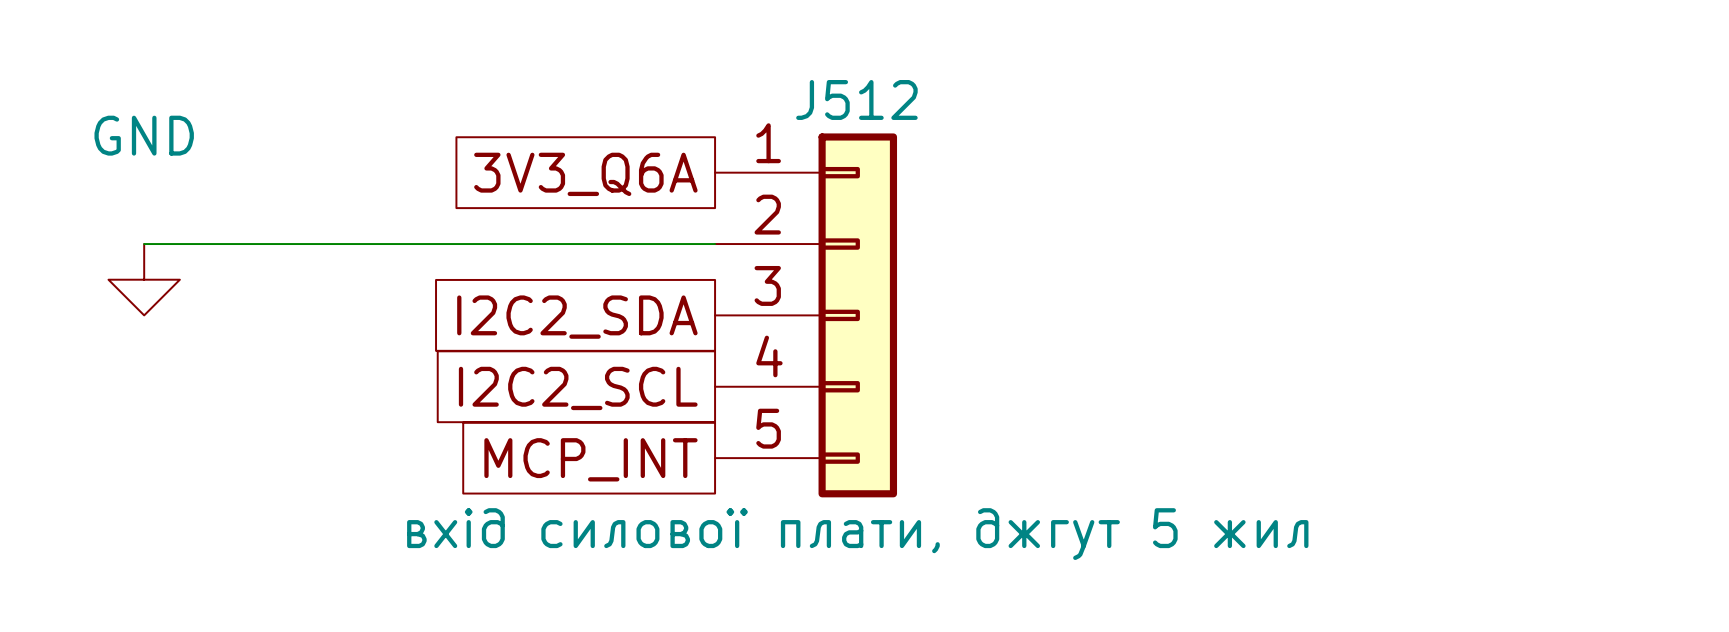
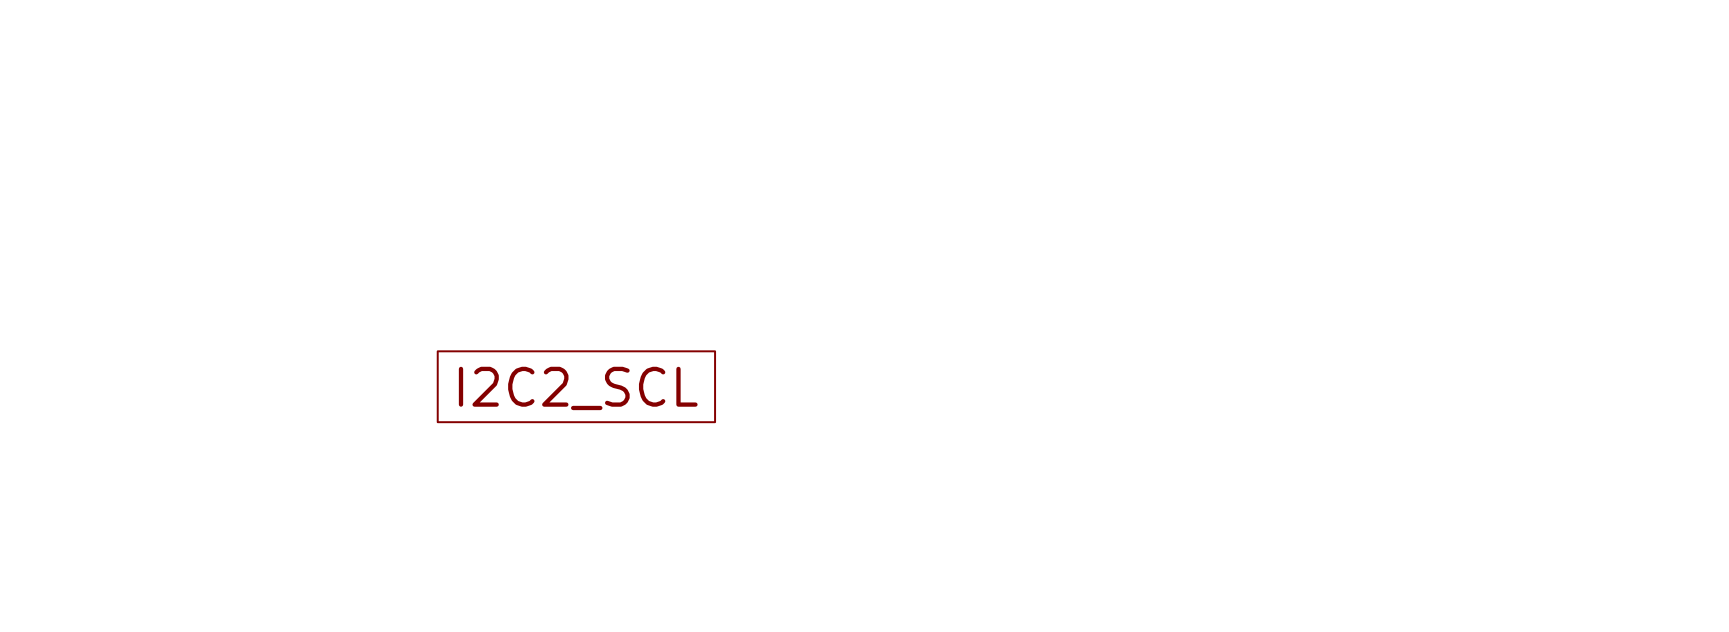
global label: 3V3_Q6A (585, 174) -> none
wire: (144, 244) (715, 244) -> none
power symbol: GND (144, 279) -> none
J512: вхід силової плати, джгут 5 жил (806, 315) -> none
global label: I2C2_SDA (577, 317) -> none
global label: MCP_INT (590, 459) -> none

